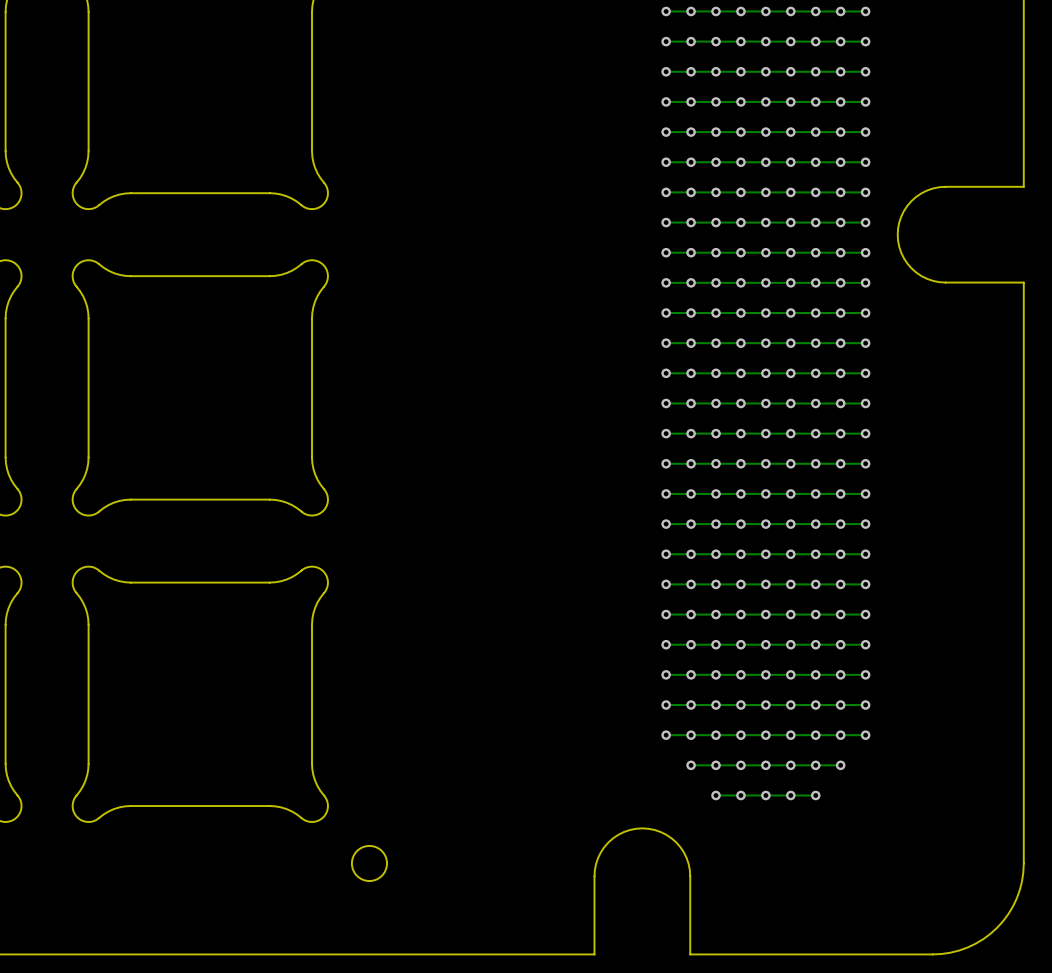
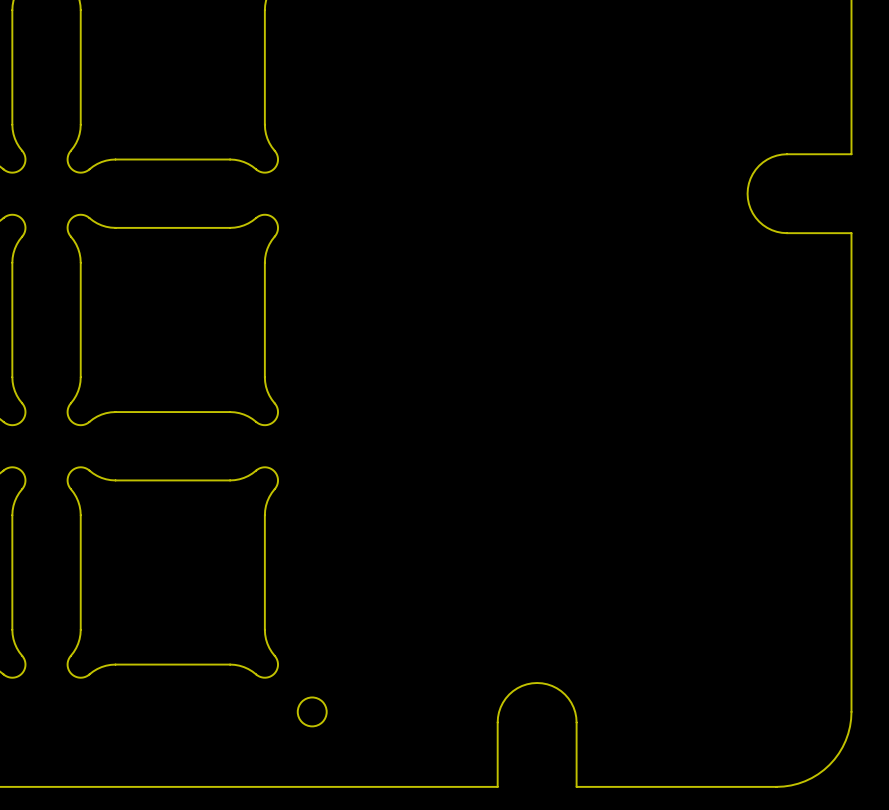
via: (666, 11) -> none
via: (691, 11) -> none
via: (716, 11) -> none
via: (740, 11) -> none
via: (765, 11) -> none
via: (790, 11) -> none
via: (815, 11) -> none
via: (840, 11) -> none
track: (865, 11) (666, 11) -> none
via: (865, 11) -> none
via: (666, 41) -> none
via: (691, 41) -> none
via: (716, 41) -> none
via: (740, 41) -> none
via: (765, 41) -> none
via: (790, 41) -> none
via: (815, 41) -> none
via: (840, 41) -> none
track: (865, 41) (666, 41) -> none
via: (865, 41) -> none
via: (666, 71) -> none
via: (691, 71) -> none
via: (716, 71) -> none
via: (740, 71) -> none
via: (765, 71) -> none
via: (790, 71) -> none
via: (815, 71) -> none
via: (840, 71) -> none
track: (865, 71) (666, 71) -> none
via: (865, 71) -> none
via: (666, 101) -> none
via: (691, 101) -> none
via: (716, 101) -> none
via: (740, 101) -> none
via: (765, 101) -> none
via: (790, 101) -> none
via: (815, 101) -> none
via: (840, 101) -> none
track: (865, 101) (666, 101) -> none
via: (865, 101) -> none
via: (666, 132) -> none
via: (691, 132) -> none
via: (716, 132) -> none
via: (740, 132) -> none
via: (765, 132) -> none
via: (790, 132) -> none
via: (815, 132) -> none
via: (840, 132) -> none
track: (865, 132) (666, 132) -> none
via: (865, 132) -> none
via: (666, 162) -> none
via: (691, 162) -> none
via: (716, 162) -> none
via: (740, 162) -> none
via: (765, 162) -> none
via: (790, 162) -> none
via: (815, 162) -> none
via: (840, 162) -> none
track: (865, 162) (666, 162) -> none
via: (865, 162) -> none
via: (666, 192) -> none
via: (691, 192) -> none
via: (716, 192) -> none
via: (740, 192) -> none
via: (765, 192) -> none
via: (790, 192) -> none
via: (815, 192) -> none
via: (840, 192) -> none
track: (865, 192) (666, 192) -> none
via: (865, 192) -> none
via: (666, 222) -> none
via: (691, 222) -> none
via: (716, 222) -> none
via: (740, 222) -> none
via: (765, 222) -> none
via: (790, 222) -> none
via: (815, 222) -> none
via: (840, 222) -> none
track: (865, 222) (666, 222) -> none
via: (865, 222) -> none
via: (666, 252) -> none
via: (691, 252) -> none
via: (716, 252) -> none
via: (740, 252) -> none
via: (765, 252) -> none
via: (790, 252) -> none
via: (815, 252) -> none
via: (840, 252) -> none
track: (865, 252) (666, 252) -> none
via: (865, 252) -> none
via: (666, 282) -> none
via: (691, 282) -> none
via: (716, 282) -> none
via: (740, 282) -> none
via: (765, 282) -> none
via: (790, 282) -> none
via: (815, 282) -> none
via: (840, 282) -> none
track: (865, 282) (666, 282) -> none
via: (865, 282) -> none
via: (666, 313) -> none
via: (691, 313) -> none
via: (716, 313) -> none
via: (740, 313) -> none
via: (765, 313) -> none
via: (790, 313) -> none
via: (815, 313) -> none
via: (840, 313) -> none
track: (865, 313) (666, 313) -> none
via: (865, 313) -> none
via: (666, 343) -> none
via: (691, 343) -> none
via: (716, 343) -> none
via: (740, 343) -> none
via: (765, 343) -> none
via: (790, 343) -> none
via: (815, 343) -> none
via: (840, 343) -> none
track: (865, 343) (666, 343) -> none
via: (865, 343) -> none
via: (666, 373) -> none
via: (691, 373) -> none
via: (716, 373) -> none
via: (740, 373) -> none
via: (765, 373) -> none
via: (790, 373) -> none
via: (815, 373) -> none
via: (840, 373) -> none
track: (865, 373) (666, 373) -> none
via: (865, 373) -> none
via: (666, 403) -> none
via: (691, 403) -> none
via: (716, 403) -> none
via: (740, 403) -> none
via: (765, 403) -> none
via: (790, 403) -> none
via: (815, 403) -> none
via: (840, 403) -> none
track: (865, 403) (666, 403) -> none
via: (865, 403) -> none
via: (666, 433) -> none
via: (691, 433) -> none
via: (716, 433) -> none
via: (740, 433) -> none
via: (765, 433) -> none
via: (790, 433) -> none
via: (815, 433) -> none
via: (840, 433) -> none
track: (865, 433) (666, 433) -> none
via: (865, 433) -> none
via: (666, 463) -> none
via: (691, 463) -> none
via: (716, 463) -> none
via: (740, 463) -> none
via: (765, 463) -> none
via: (790, 463) -> none
via: (815, 463) -> none
via: (840, 463) -> none
track: (865, 463) (666, 463) -> none
via: (865, 463) -> none
via: (666, 493) -> none
via: (691, 493) -> none
via: (716, 493) -> none
via: (740, 493) -> none
via: (765, 493) -> none
via: (790, 493) -> none
via: (815, 493) -> none
via: (840, 493) -> none
track: (865, 493) (666, 493) -> none
via: (865, 493) -> none
via: (666, 524) -> none
via: (691, 524) -> none
via: (716, 524) -> none
via: (740, 524) -> none
via: (765, 524) -> none
via: (790, 524) -> none
via: (815, 524) -> none
via: (840, 524) -> none
track: (865, 524) (666, 524) -> none
via: (865, 524) -> none
via: (666, 554) -> none
via: (691, 554) -> none
via: (716, 554) -> none
via: (740, 554) -> none
via: (765, 554) -> none
via: (790, 554) -> none
via: (815, 554) -> none
via: (840, 554) -> none
track: (865, 554) (666, 554) -> none
via: (865, 554) -> none
via: (666, 584) -> none
via: (691, 584) -> none
via: (716, 584) -> none
via: (740, 584) -> none
via: (765, 584) -> none
via: (790, 584) -> none
via: (815, 584) -> none
via: (840, 584) -> none
track: (865, 584) (666, 584) -> none
via: (865, 584) -> none
via: (666, 614) -> none
via: (691, 614) -> none
via: (716, 614) -> none
via: (740, 614) -> none
via: (765, 614) -> none
via: (790, 614) -> none
via: (815, 614) -> none
via: (840, 614) -> none
track: (865, 614) (666, 614) -> none
via: (865, 614) -> none
via: (666, 644) -> none
via: (691, 644) -> none
via: (716, 644) -> none
via: (740, 644) -> none
via: (765, 644) -> none
via: (790, 644) -> none
via: (815, 644) -> none
via: (840, 644) -> none
track: (865, 644) (666, 644) -> none
via: (865, 644) -> none
via: (666, 674) -> none
via: (691, 674) -> none
via: (716, 674) -> none
via: (740, 674) -> none
via: (765, 674) -> none
via: (790, 674) -> none
via: (815, 674) -> none
via: (840, 674) -> none
track: (865, 674) (666, 674) -> none
via: (865, 674) -> none
via: (666, 705) -> none
via: (691, 705) -> none
via: (716, 705) -> none
via: (740, 705) -> none
via: (765, 705) -> none
via: (790, 705) -> none
via: (815, 705) -> none
via: (840, 705) -> none
track: (865, 705) (666, 705) -> none
via: (865, 705) -> none
via: (666, 735) -> none
via: (691, 735) -> none
via: (716, 735) -> none
via: (740, 735) -> none
via: (765, 735) -> none
via: (790, 735) -> none
via: (815, 735) -> none
via: (840, 735) -> none
track: (865, 735) (666, 735) -> none
via: (865, 735) -> none
via: (691, 765) -> none
via: (716, 765) -> none
via: (740, 765) -> none
via: (765, 765) -> none
via: (790, 765) -> none
via: (815, 765) -> none
track: (840, 765) (691, 765) -> none
via: (840, 765) -> none
via: (716, 795) -> none
via: (740, 795) -> none
via: (765, 795) -> none
via: (790, 795) -> none
track: (815, 795) (716, 795) -> none
via: (815, 795) -> none

